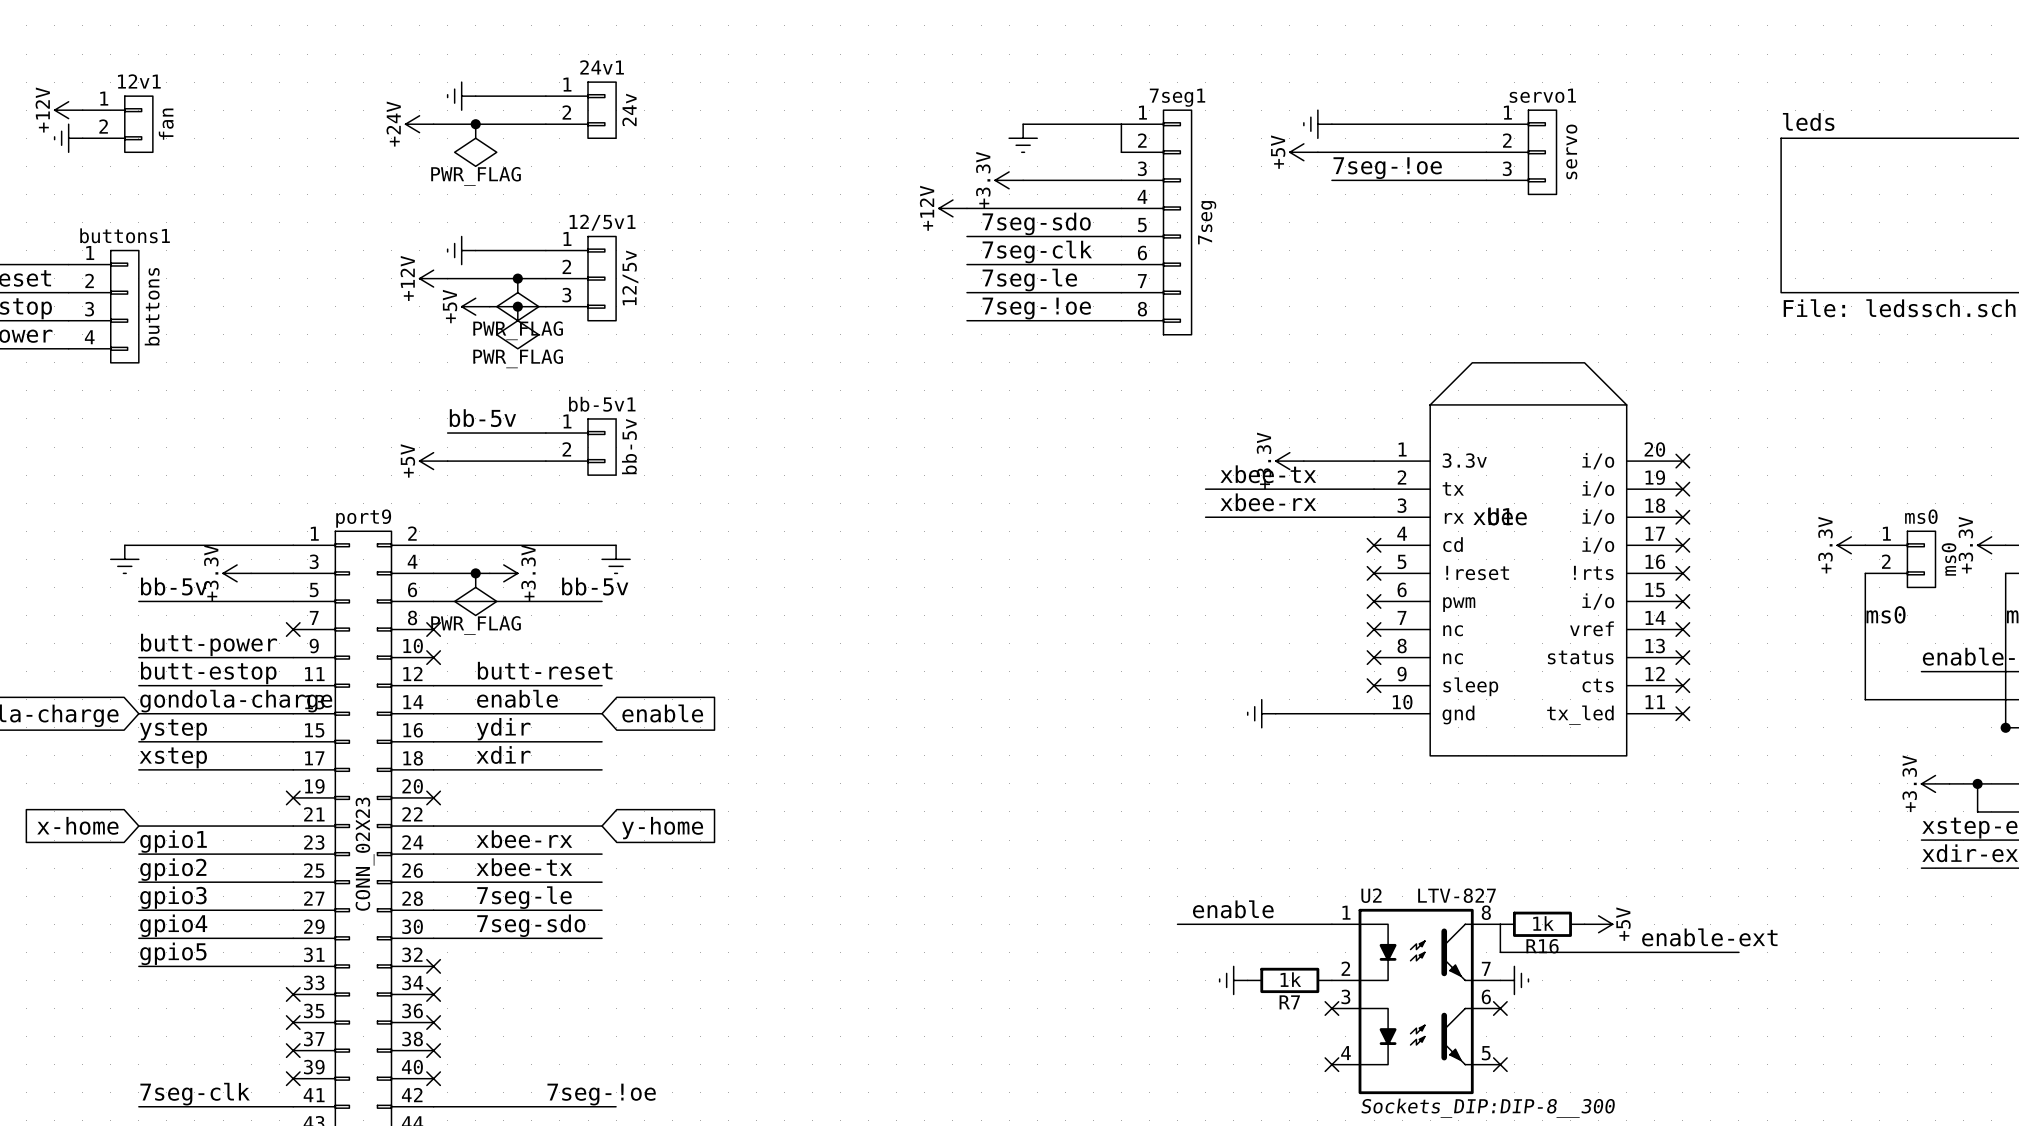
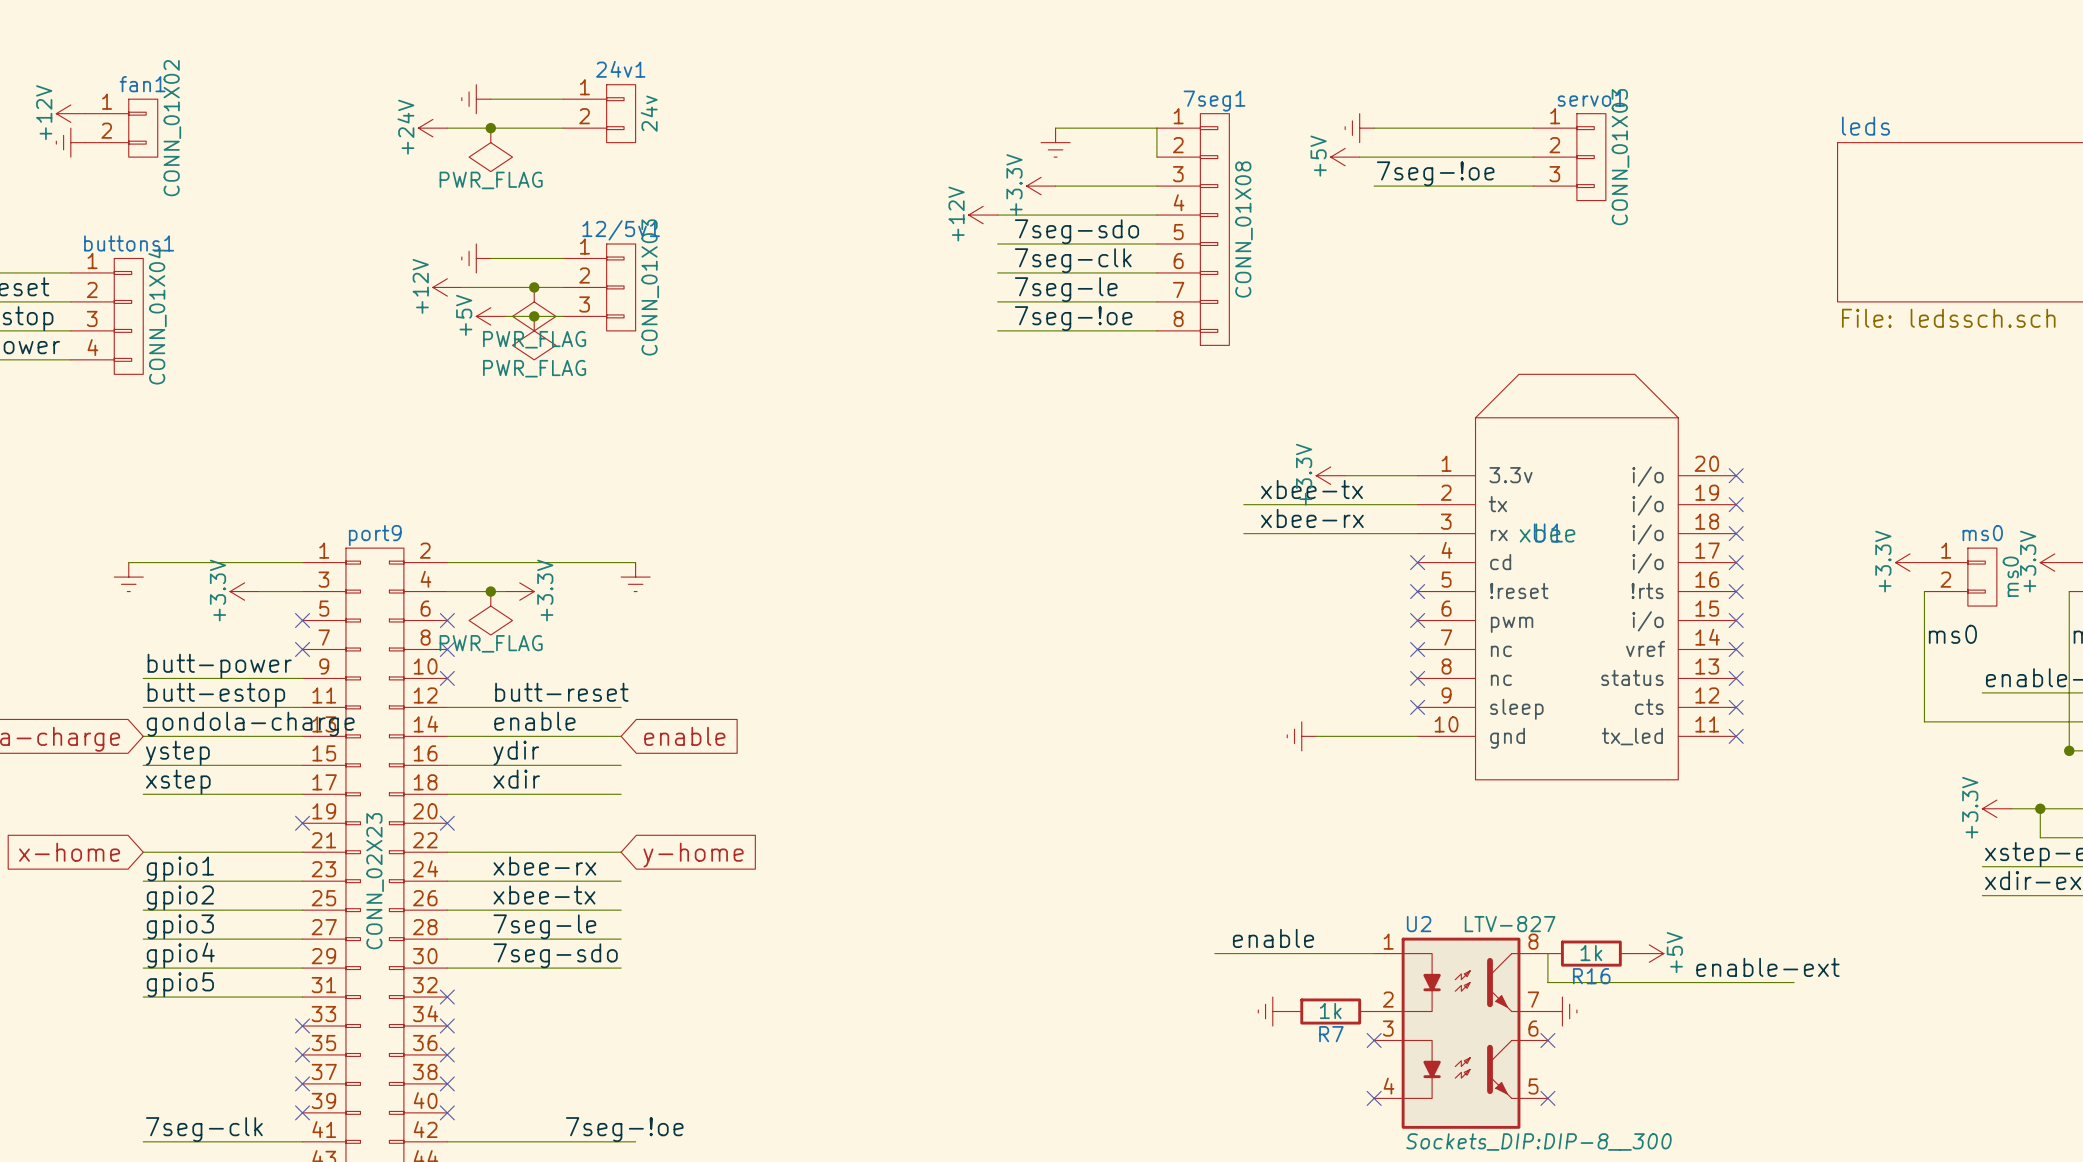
12v1 name: 12v1 (139, 81) -> fan1 (142, 84)
12v1 value: fan (166, 124) -> CONN_01X02 (172, 128)
servo1 value: servo (1571, 151) -> CONN_01X03 (1620, 157)
7seg1 value: 7seg (1207, 222) -> CONN_01X08 (1243, 229)
12/5v1 value: 12/5v (630, 277) -> CONN_01X03 (650, 287)
buttons1 value: buttons (152, 306) -> CONN_01X04 (157, 316)
label: bb-5v (482, 418) -> none
wire: (447, 433) (545, 433) -> none
bb-5v1: bb-5v (580, 447) -> none
power symbol: +5V (433, 461) -> none
wire: (447, 461) (545, 461) -> none
label: bb-5v (174, 586) -> none
label: bb-5v (595, 586) -> none
wire: (138, 601) (293, 601) -> none
no-connect mark: none -> (302, 620)
wire: (433, 601) (602, 601) -> none
no-connect mark: none -> (447, 620)

